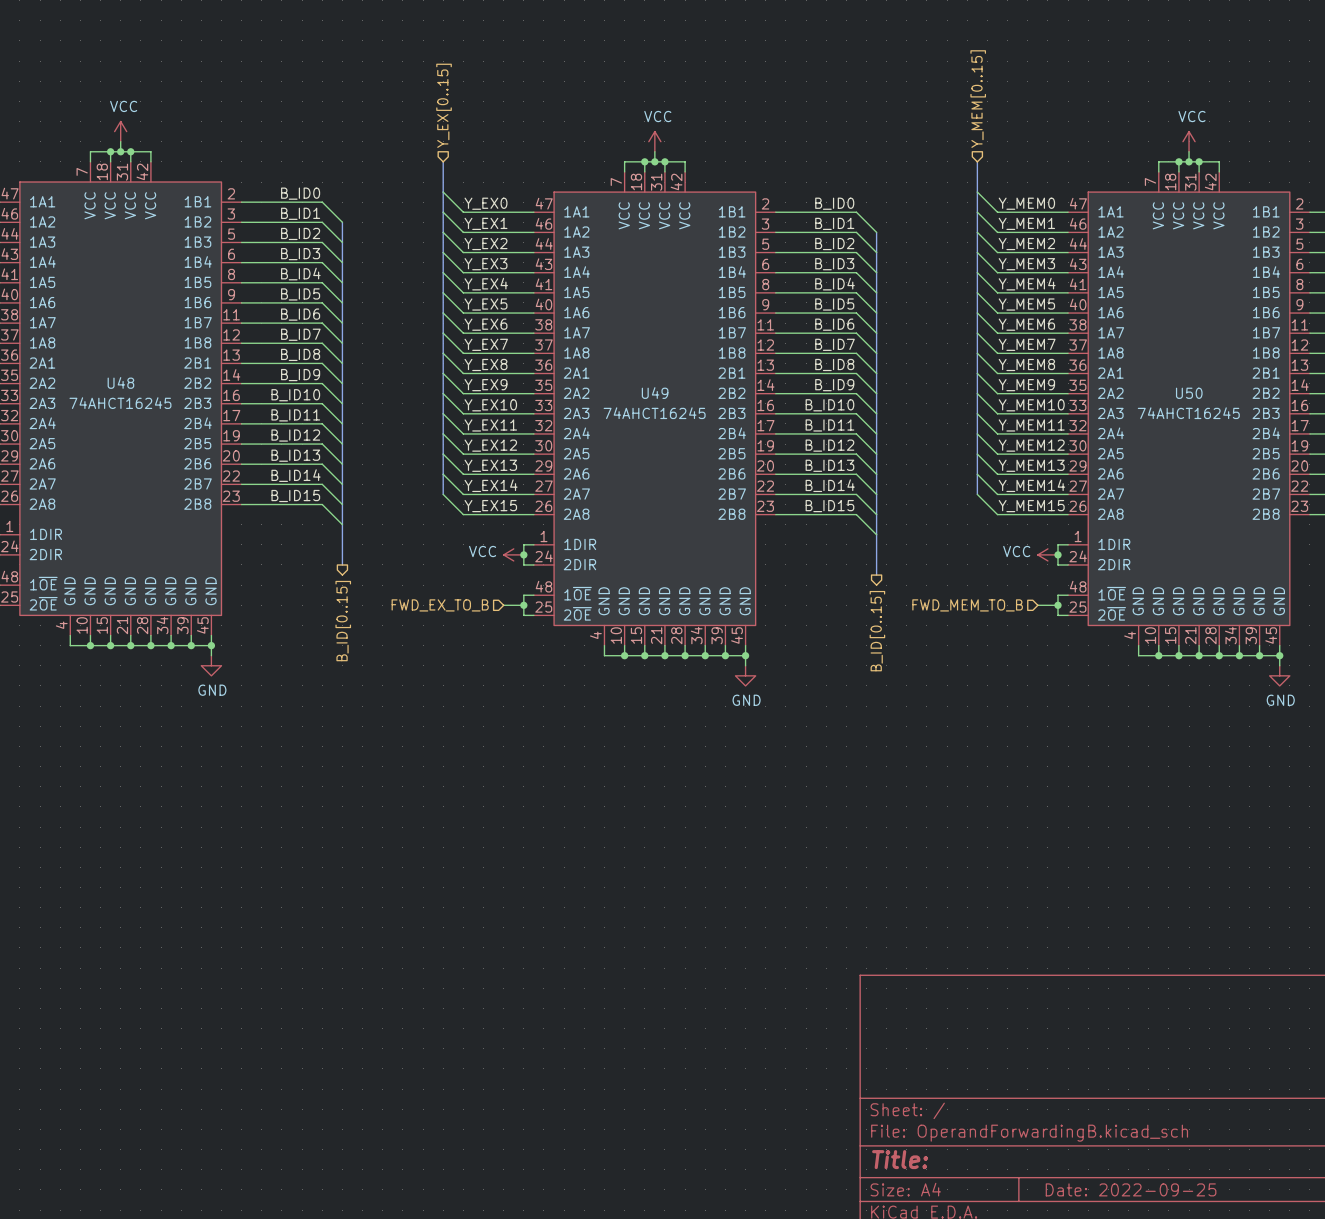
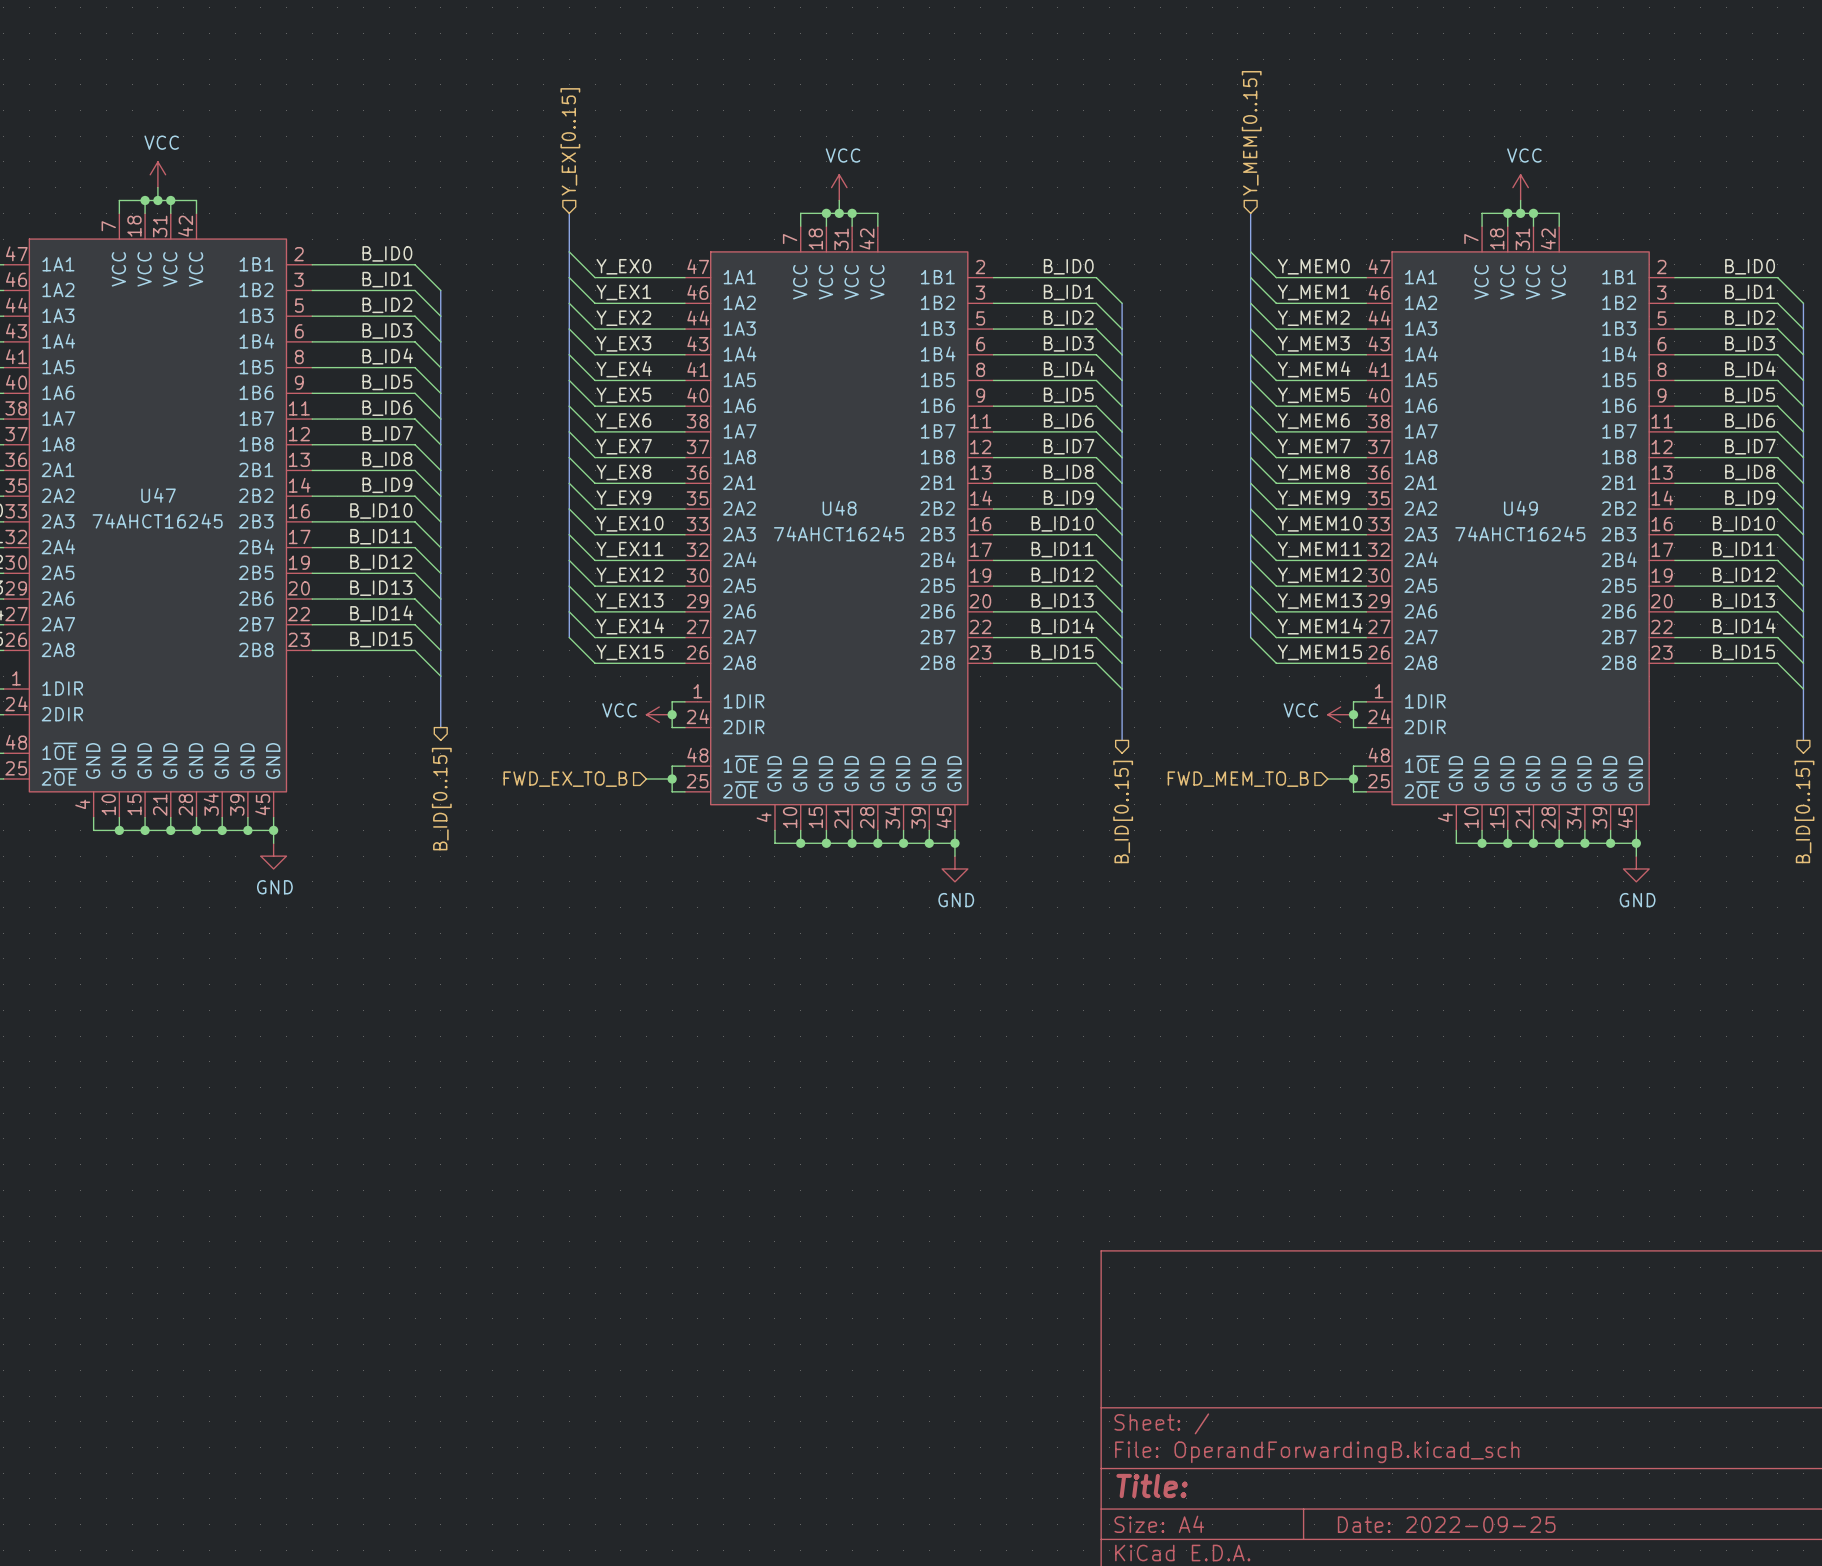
U48 name: U48 (120, 382) -> U47 (158, 495)
U49 name: U49 (655, 393) -> U48 (839, 508)
U50 name: U50 (1189, 393) -> U49 (1520, 508)

